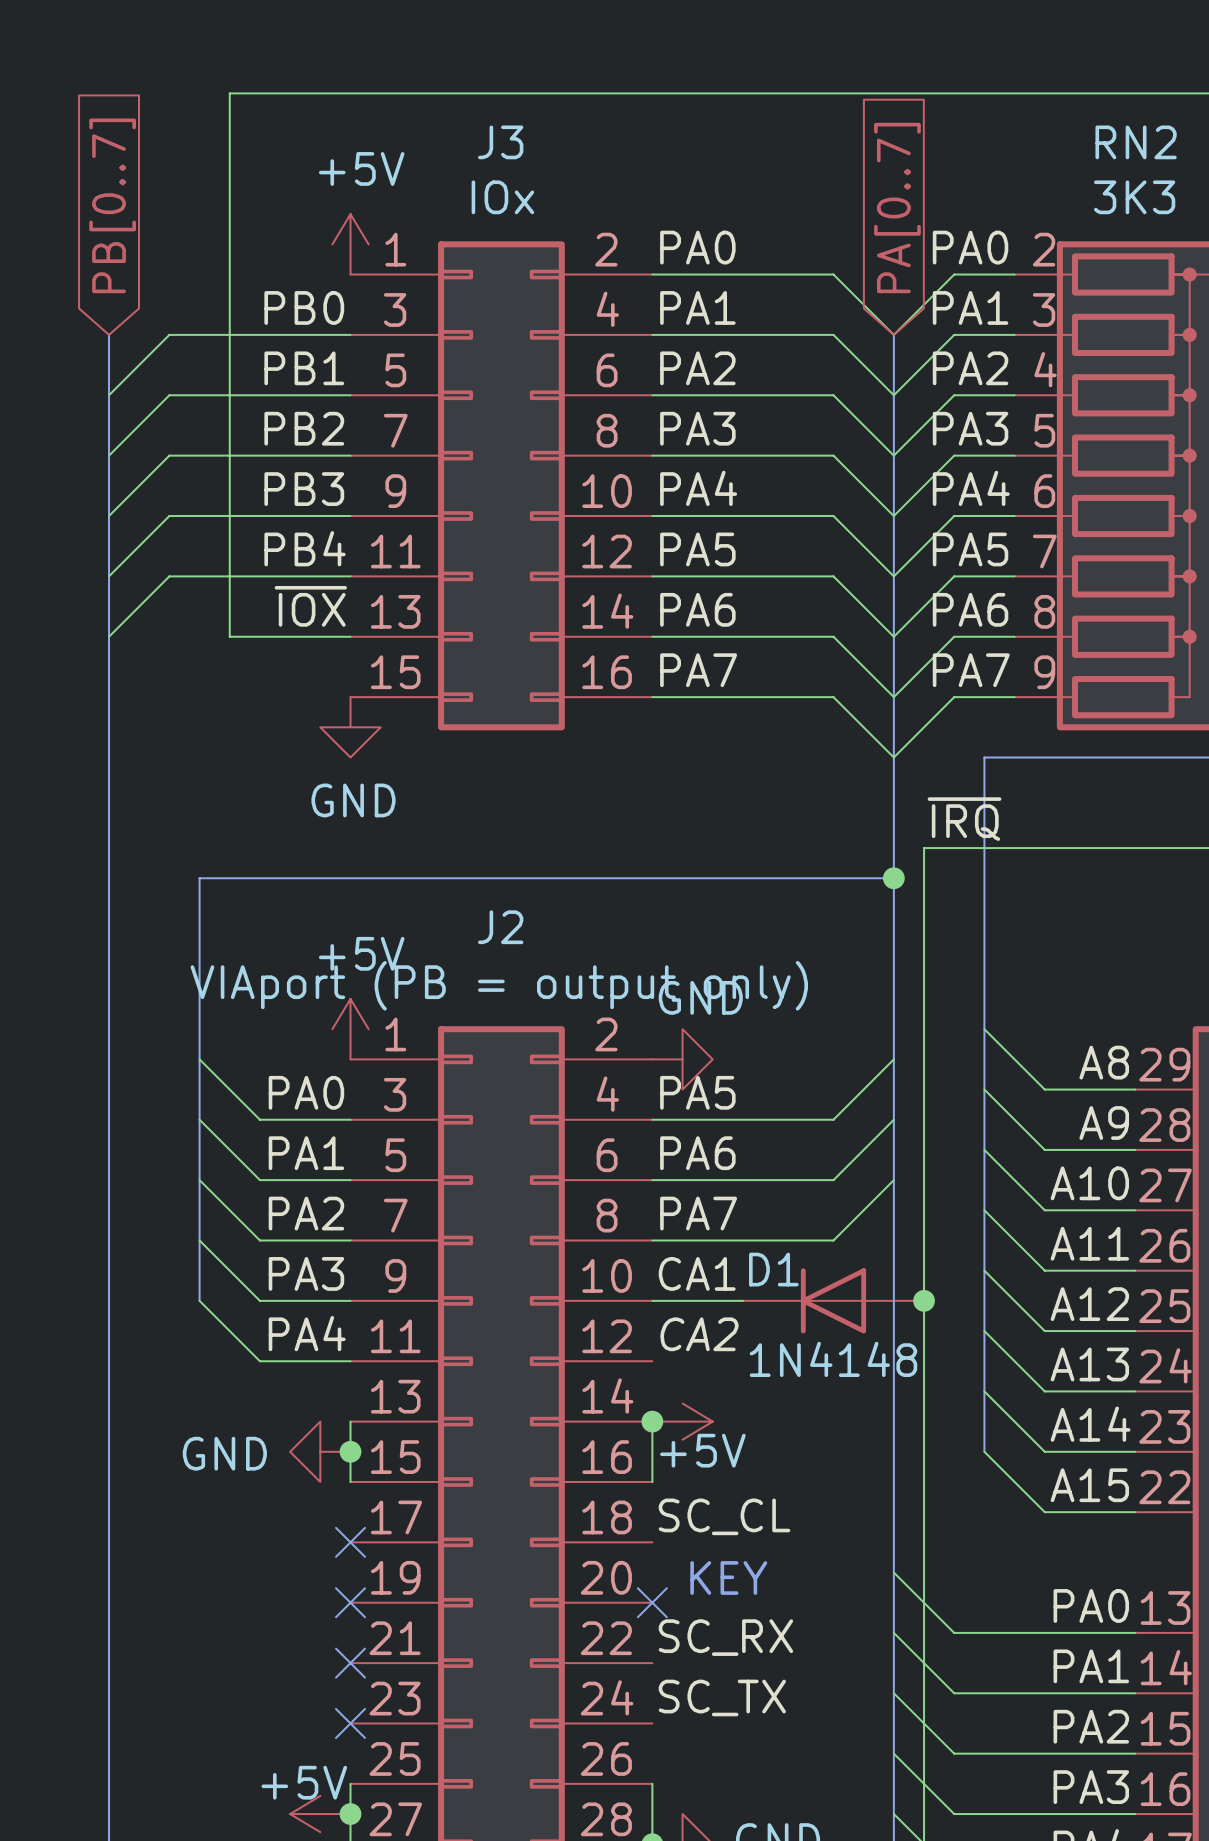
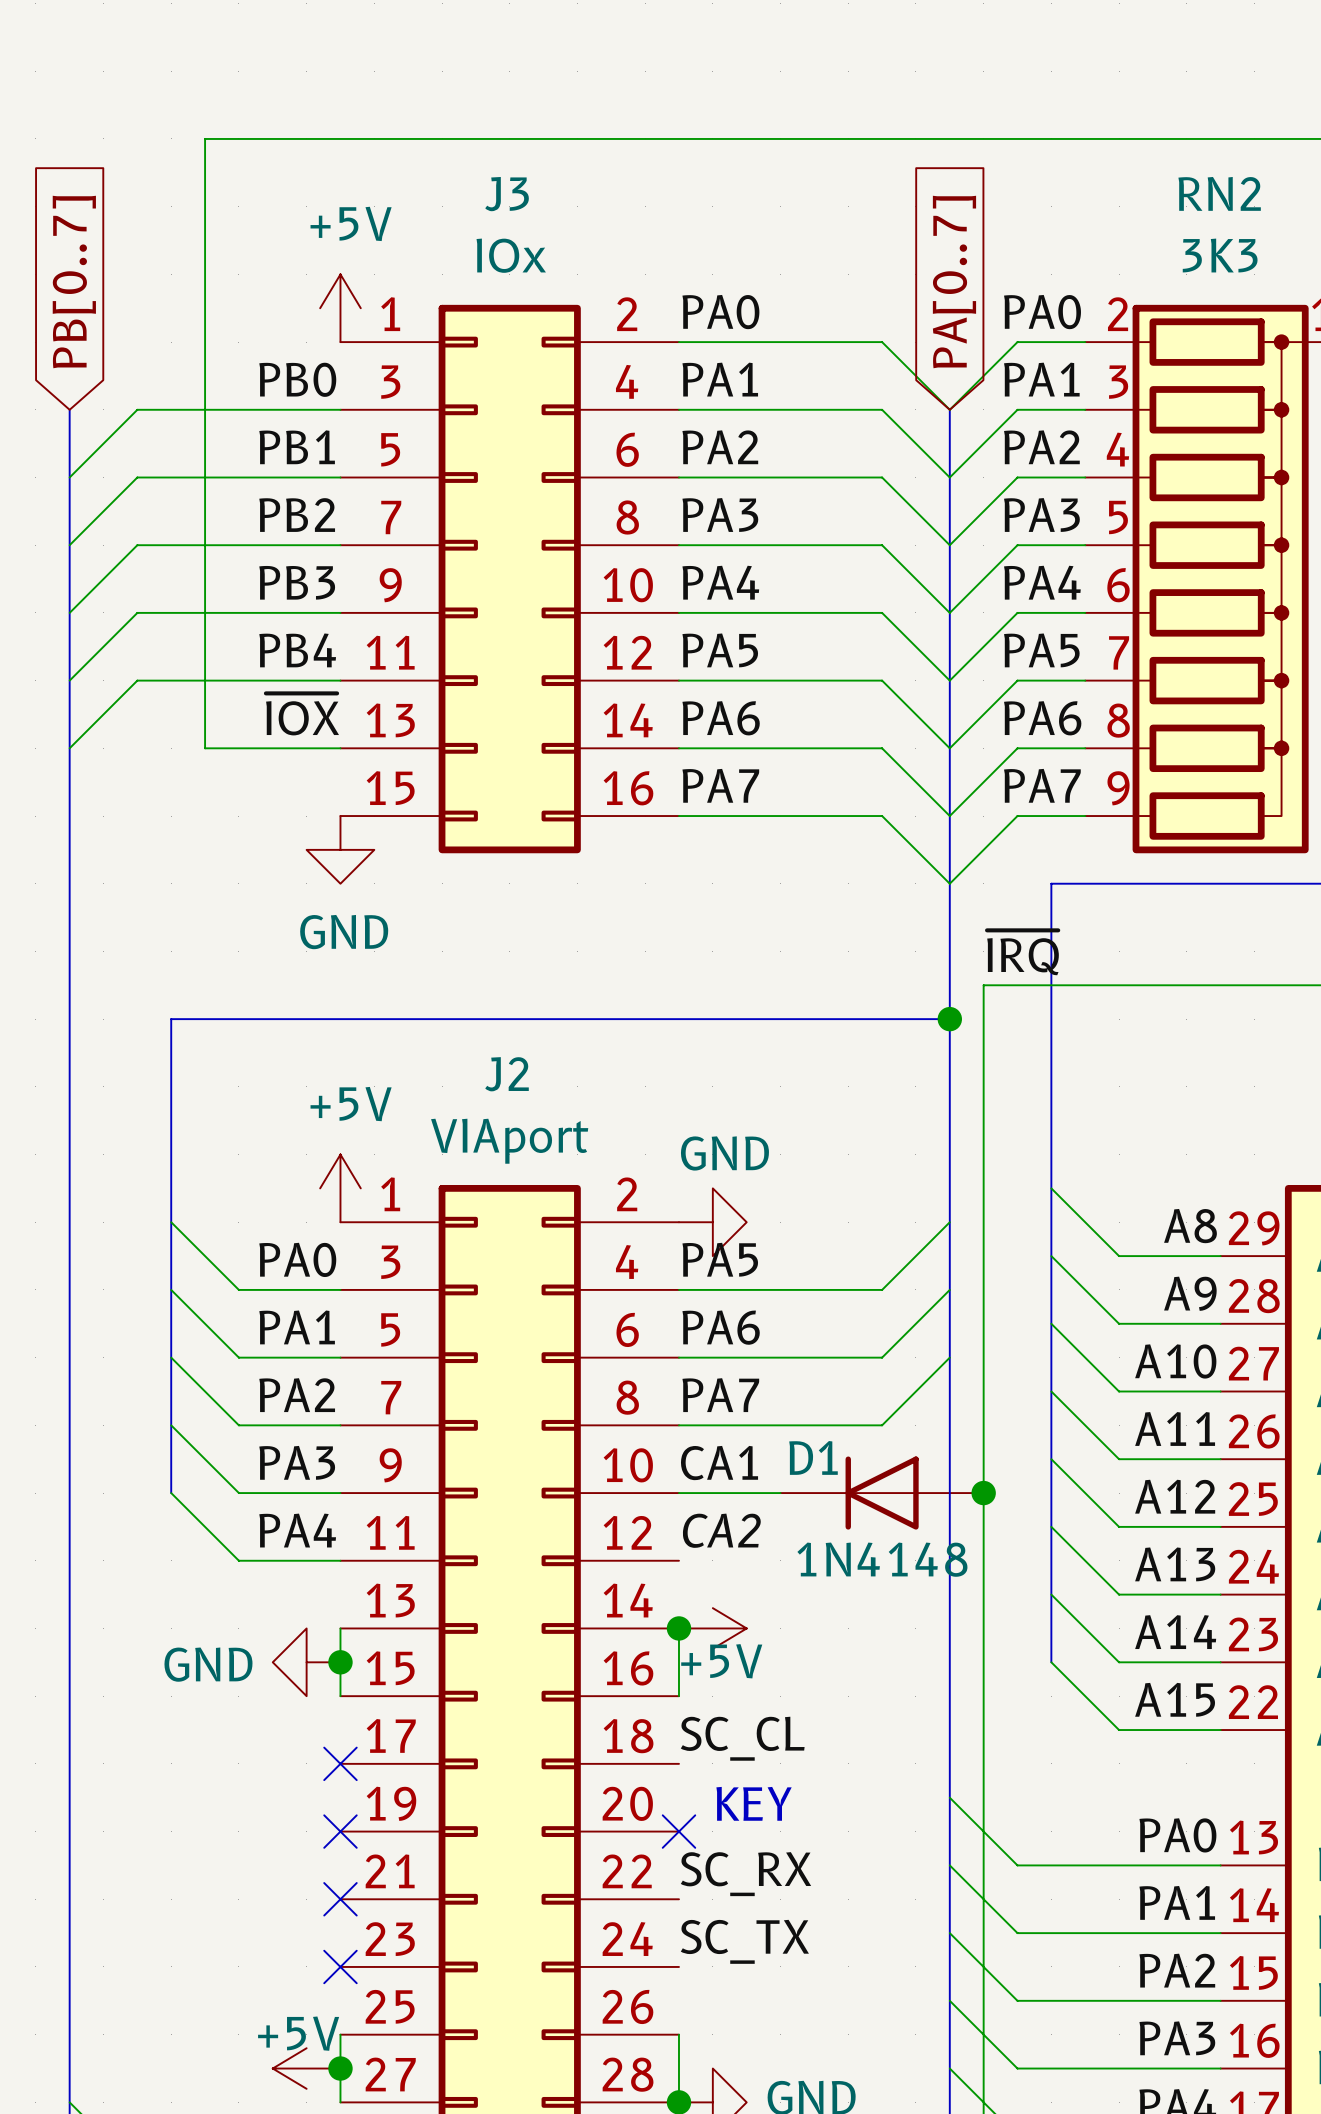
J2 value: VIAport (PB = output only) (499, 985) -> VIAport (509, 1141)

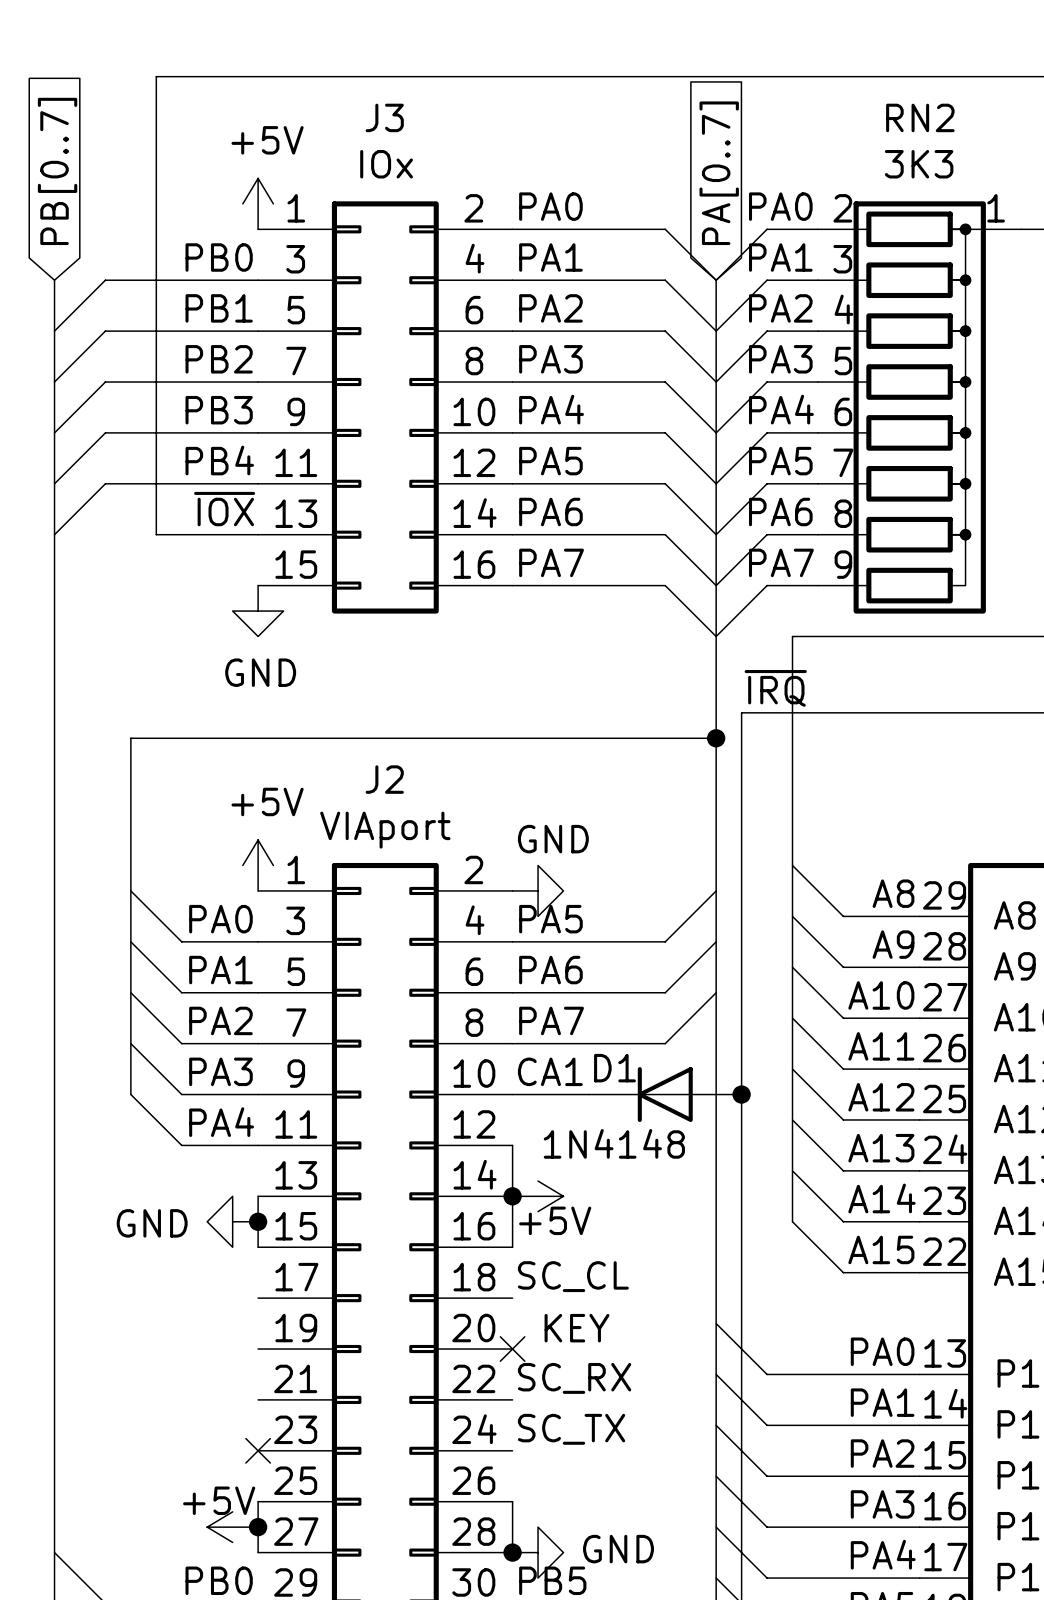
label: CA2 (721, 1530) -> none
D1 value position: 1N4148 (882, 1559) -> 1N4148 (614, 1143)
wire: none -> (512, 1145) (512, 1196)
no-connect mark: (340, 1763) -> none
no-connect mark: (340, 1831) -> none
no-connect mark: (340, 1899) -> none

